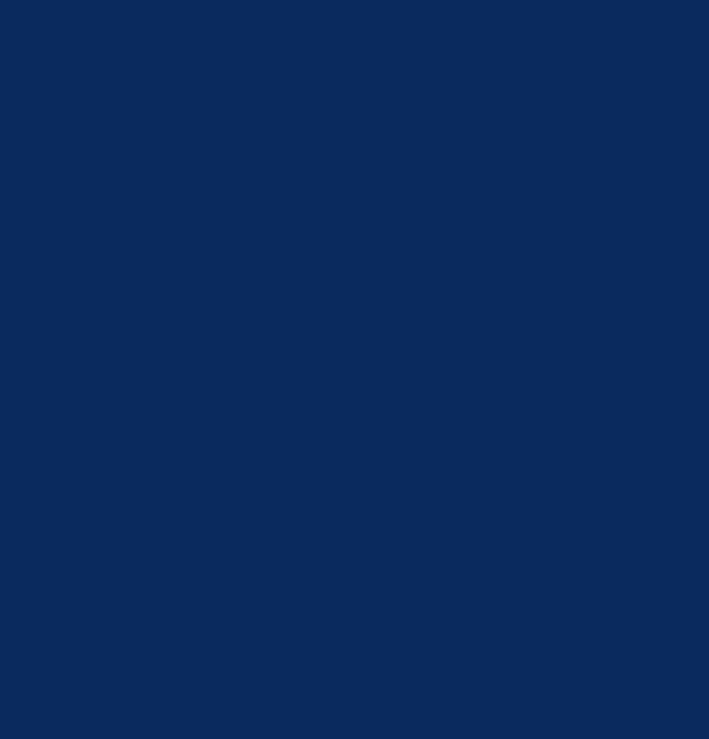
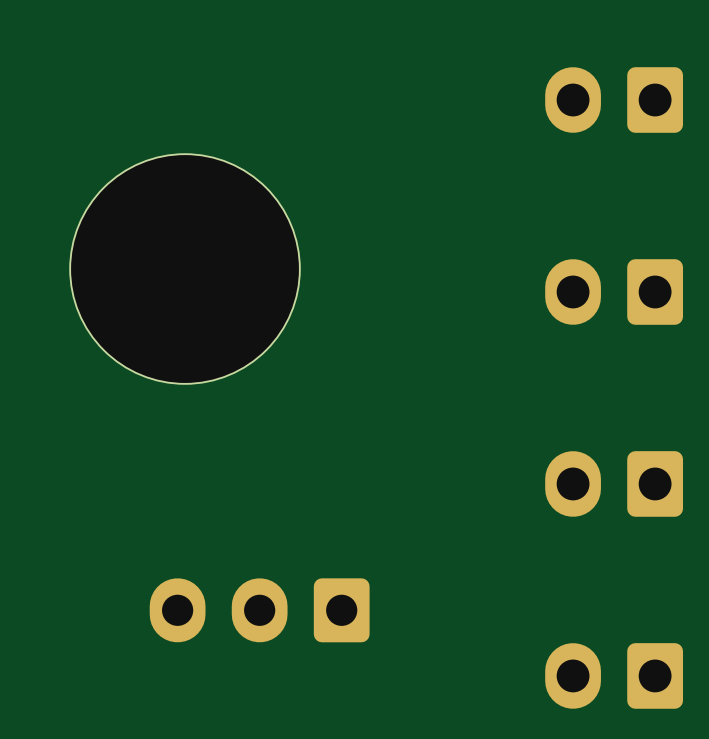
part: none -> (614, 100)
part: none -> (185, 269)
part: none -> (614, 291)
part: none -> (614, 483)
part: none -> (259, 610)
part: none -> (614, 675)

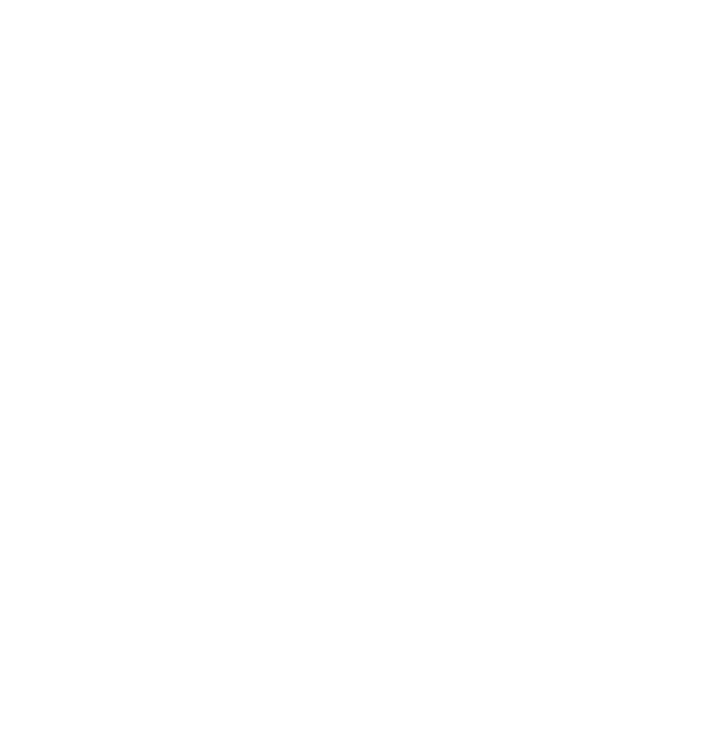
part: (614, 100) -> none
part: (185, 269) -> none
part: (614, 291) -> none
part: (614, 483) -> none
part: (259, 610) -> none
part: (614, 675) -> none

